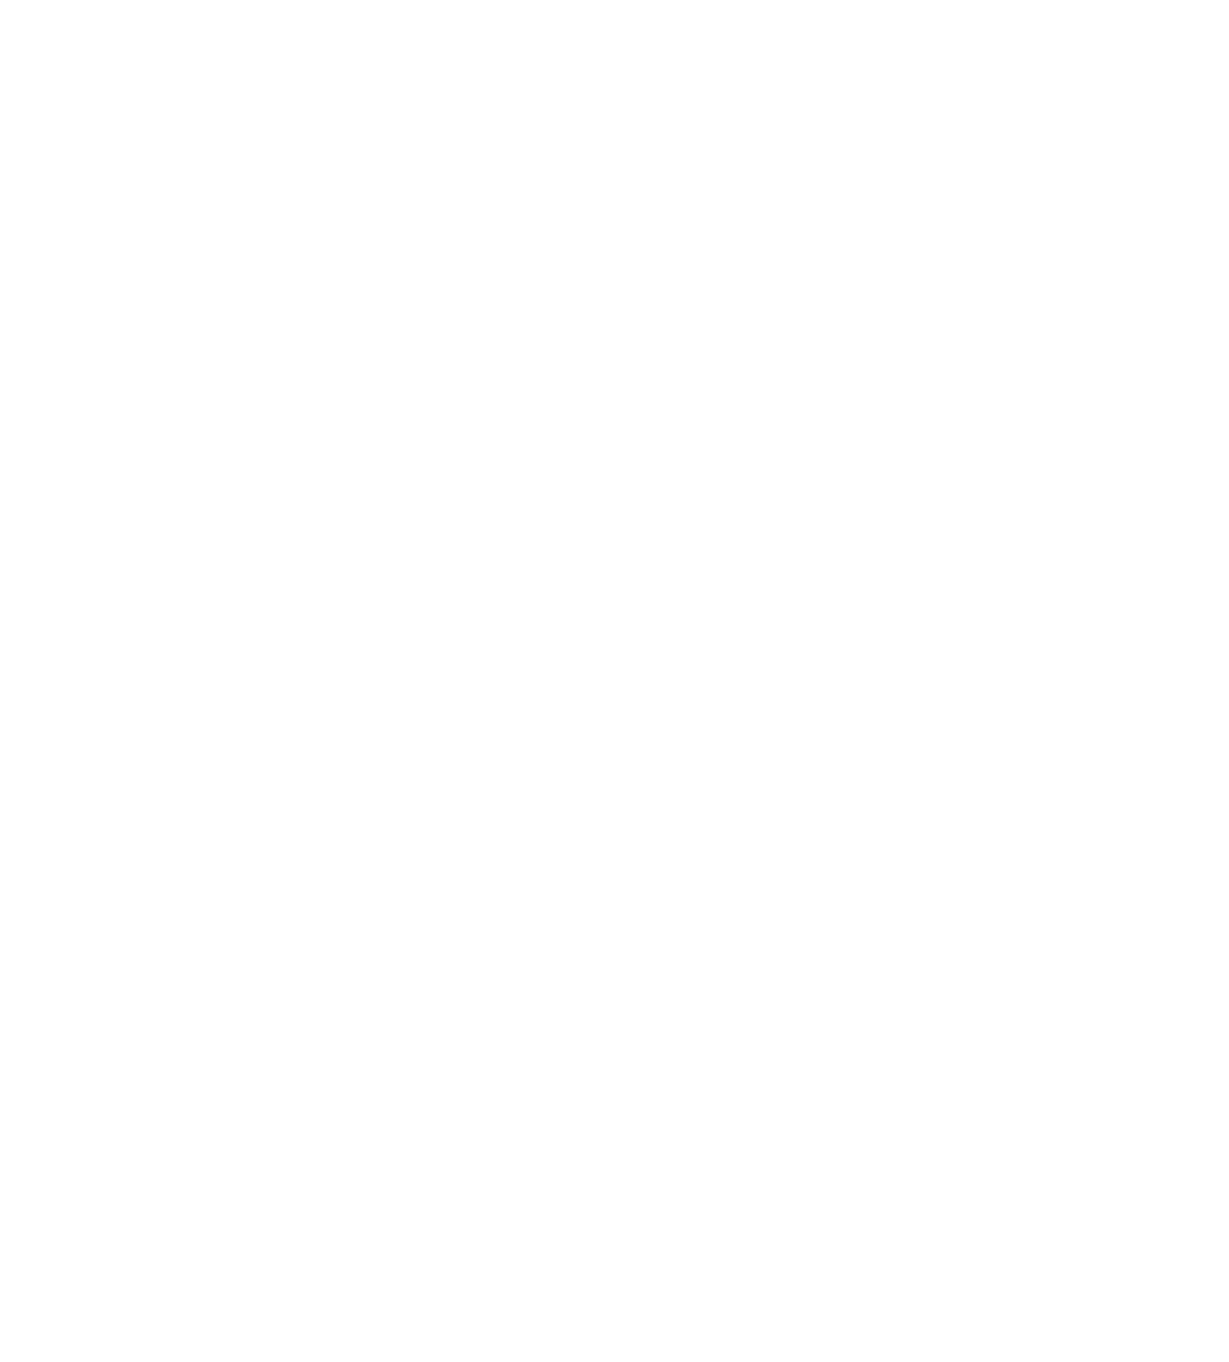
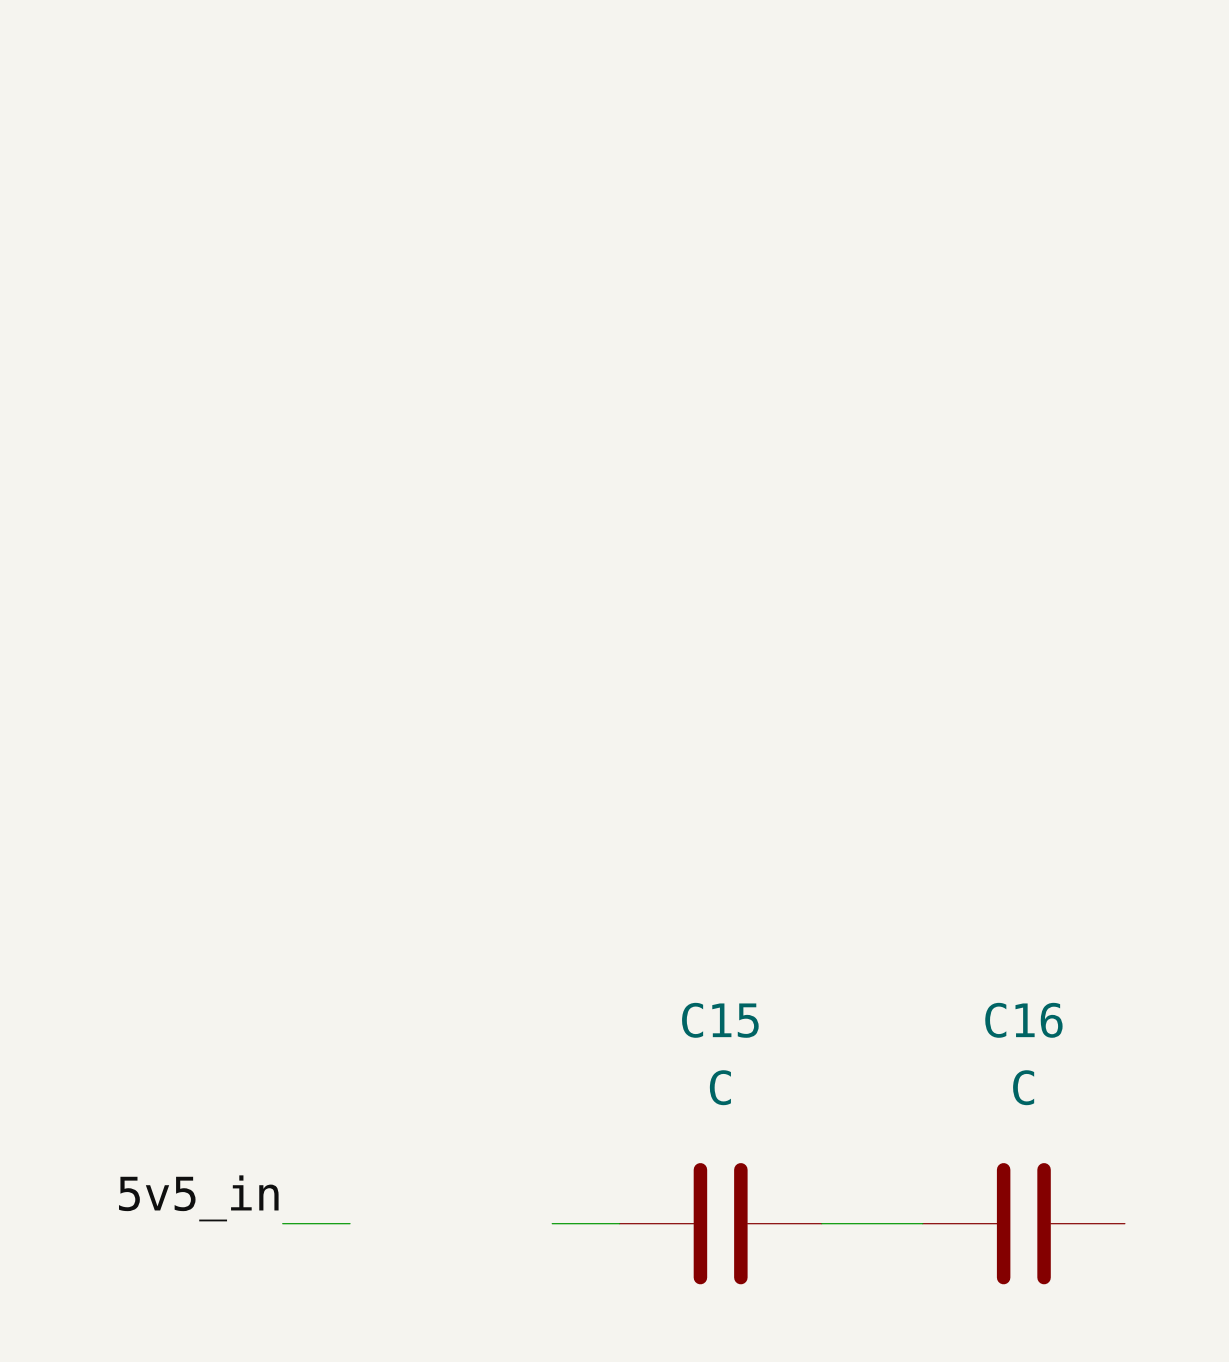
label: none -> 5v5_in (198, 1198)
wire: none -> (282, 1223) (350, 1223)
wire: none -> (552, 1223) (619, 1223)
C15: none -> C (720, 1223)
wire: none -> (821, 1223) (922, 1223)
C16: none -> C (1023, 1223)

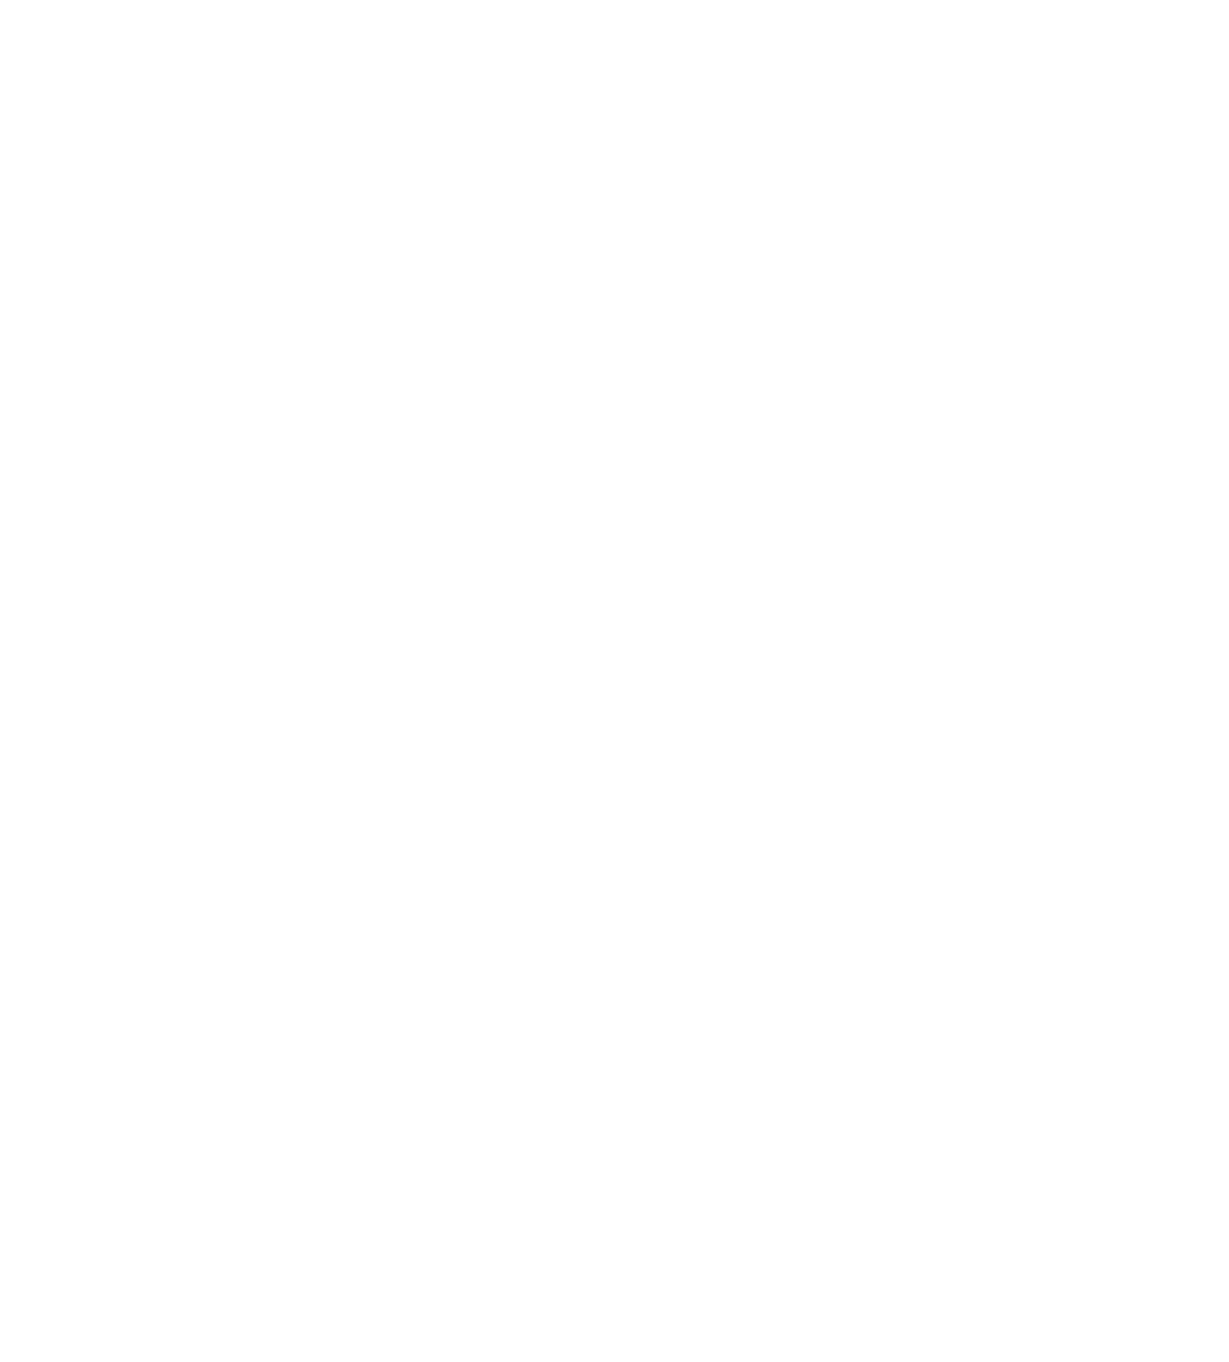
label: 5v5_in (198, 1198) -> none
wire: (282, 1223) (350, 1223) -> none
wire: (552, 1223) (619, 1223) -> none
C15: C (720, 1223) -> none
wire: (821, 1223) (922, 1223) -> none
C16: C (1023, 1223) -> none

